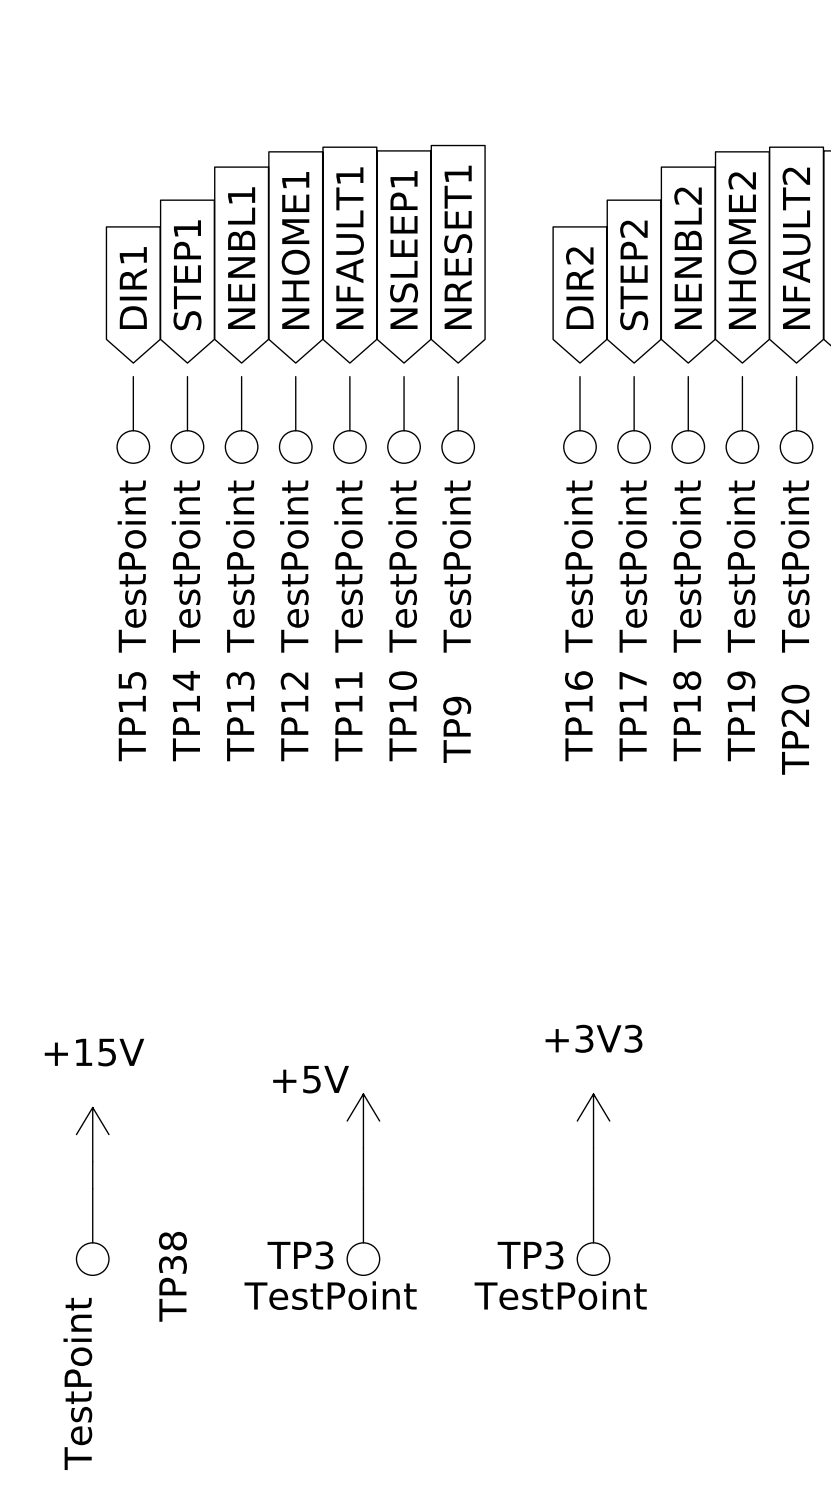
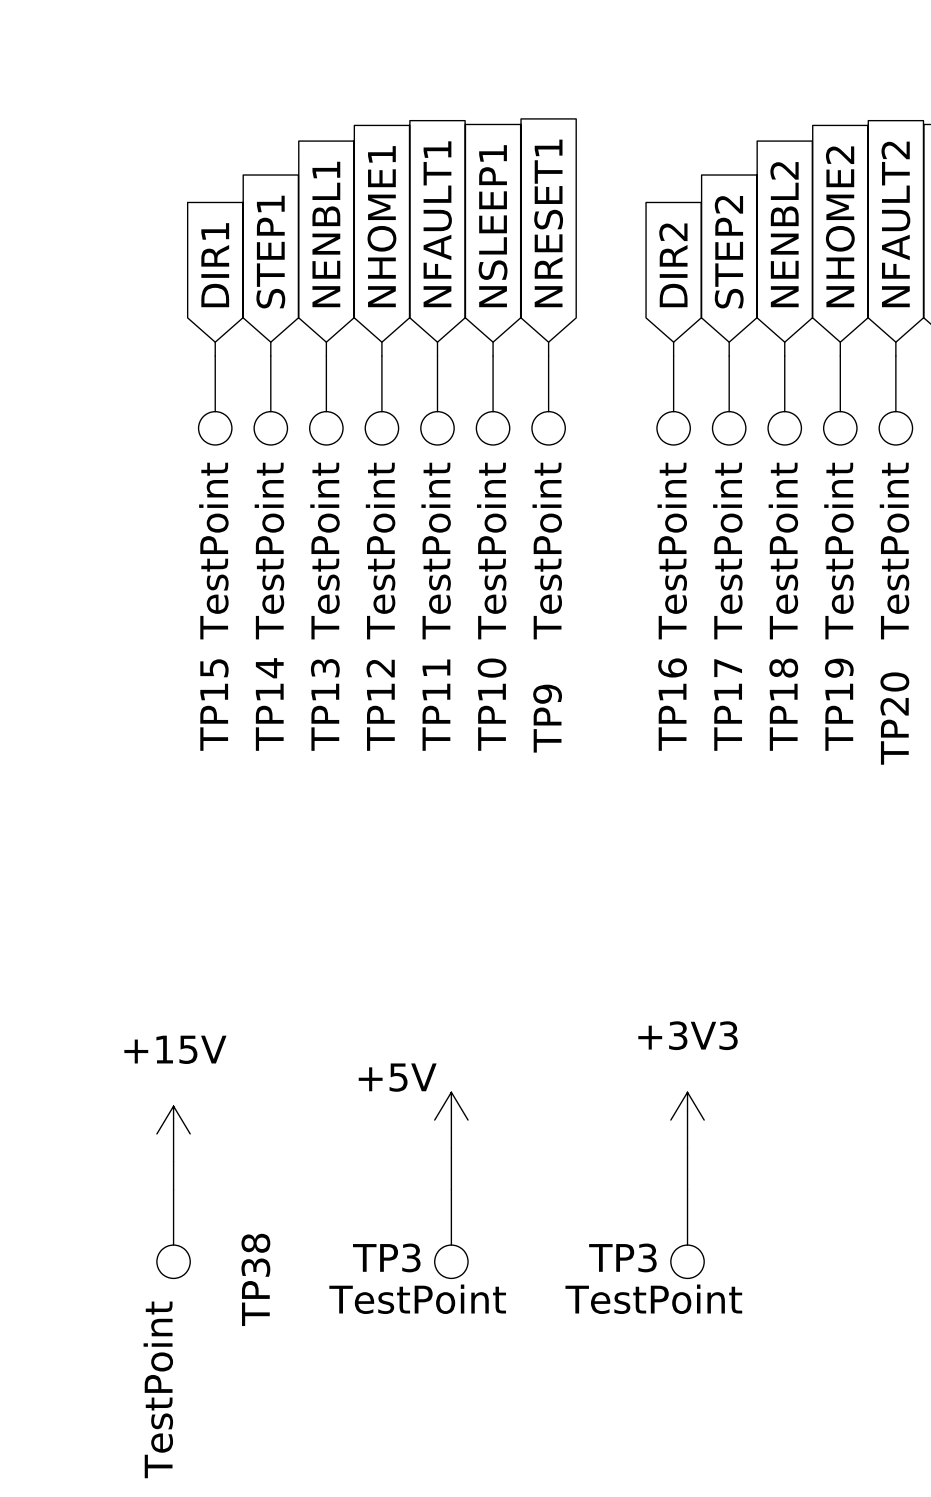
wire: none -> (215, 342) (215, 356)
wire: none -> (270, 342) (270, 356)
wire: none -> (326, 342) (326, 356)
wire: none -> (381, 342) (381, 356)
wire: none -> (437, 342) (437, 356)
wire: none -> (493, 342) (493, 356)
wire: none -> (548, 342) (548, 356)
wire: none -> (673, 342) (673, 356)
wire: none -> (729, 342) (729, 356)
wire: none -> (784, 342) (784, 356)
wire: none -> (840, 342) (840, 356)
wire: none -> (895, 342) (895, 356)

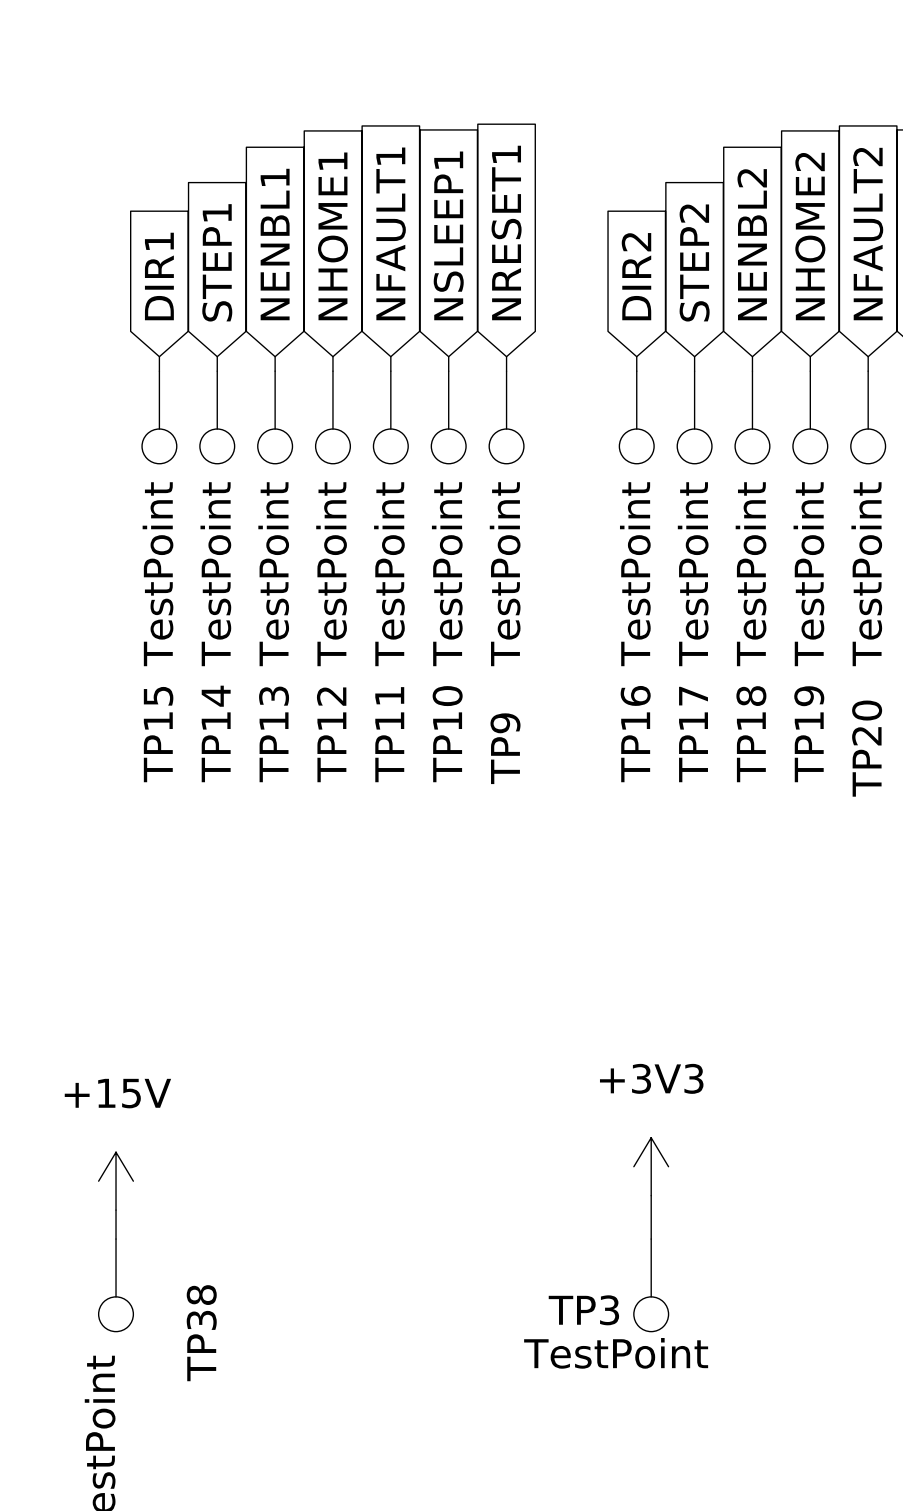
power symbol: +5V (451, 1120) -> none
wire: (451, 1147) (451, 1189) -> none
TP3: TestPoint (451, 1233) -> none

